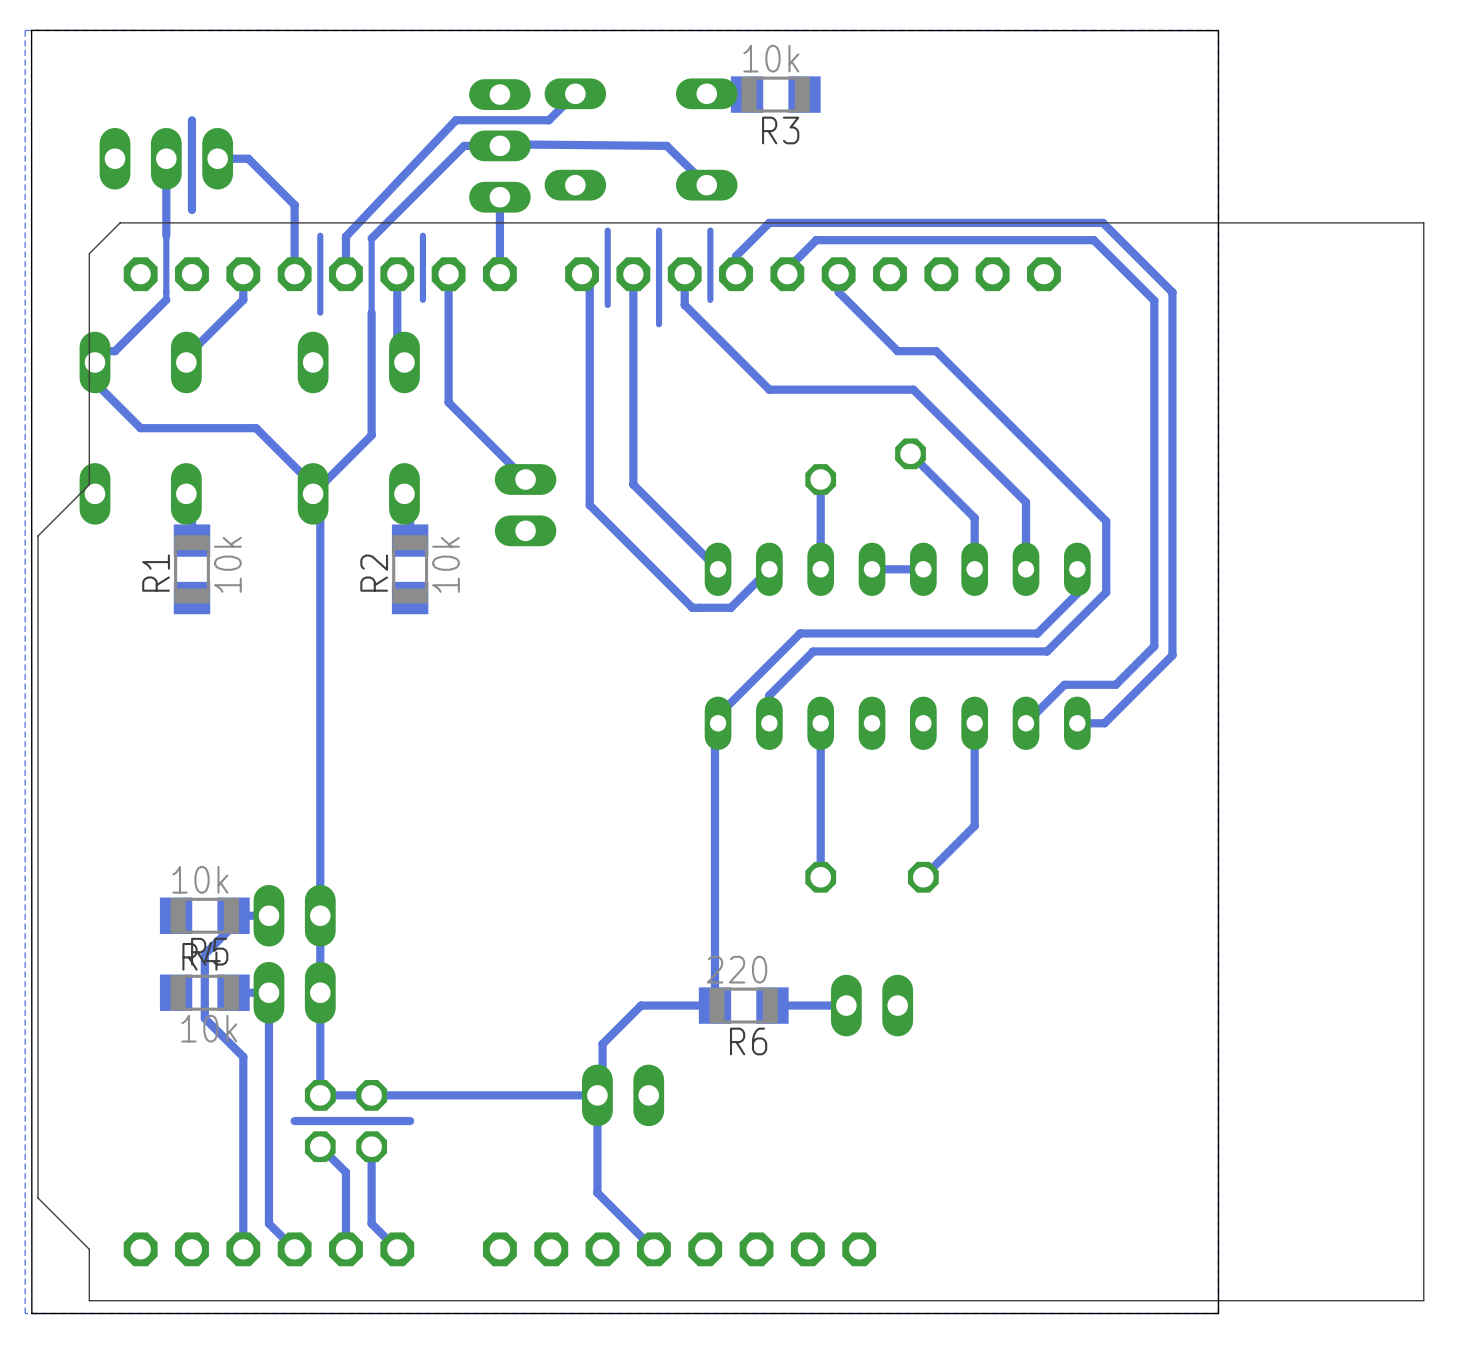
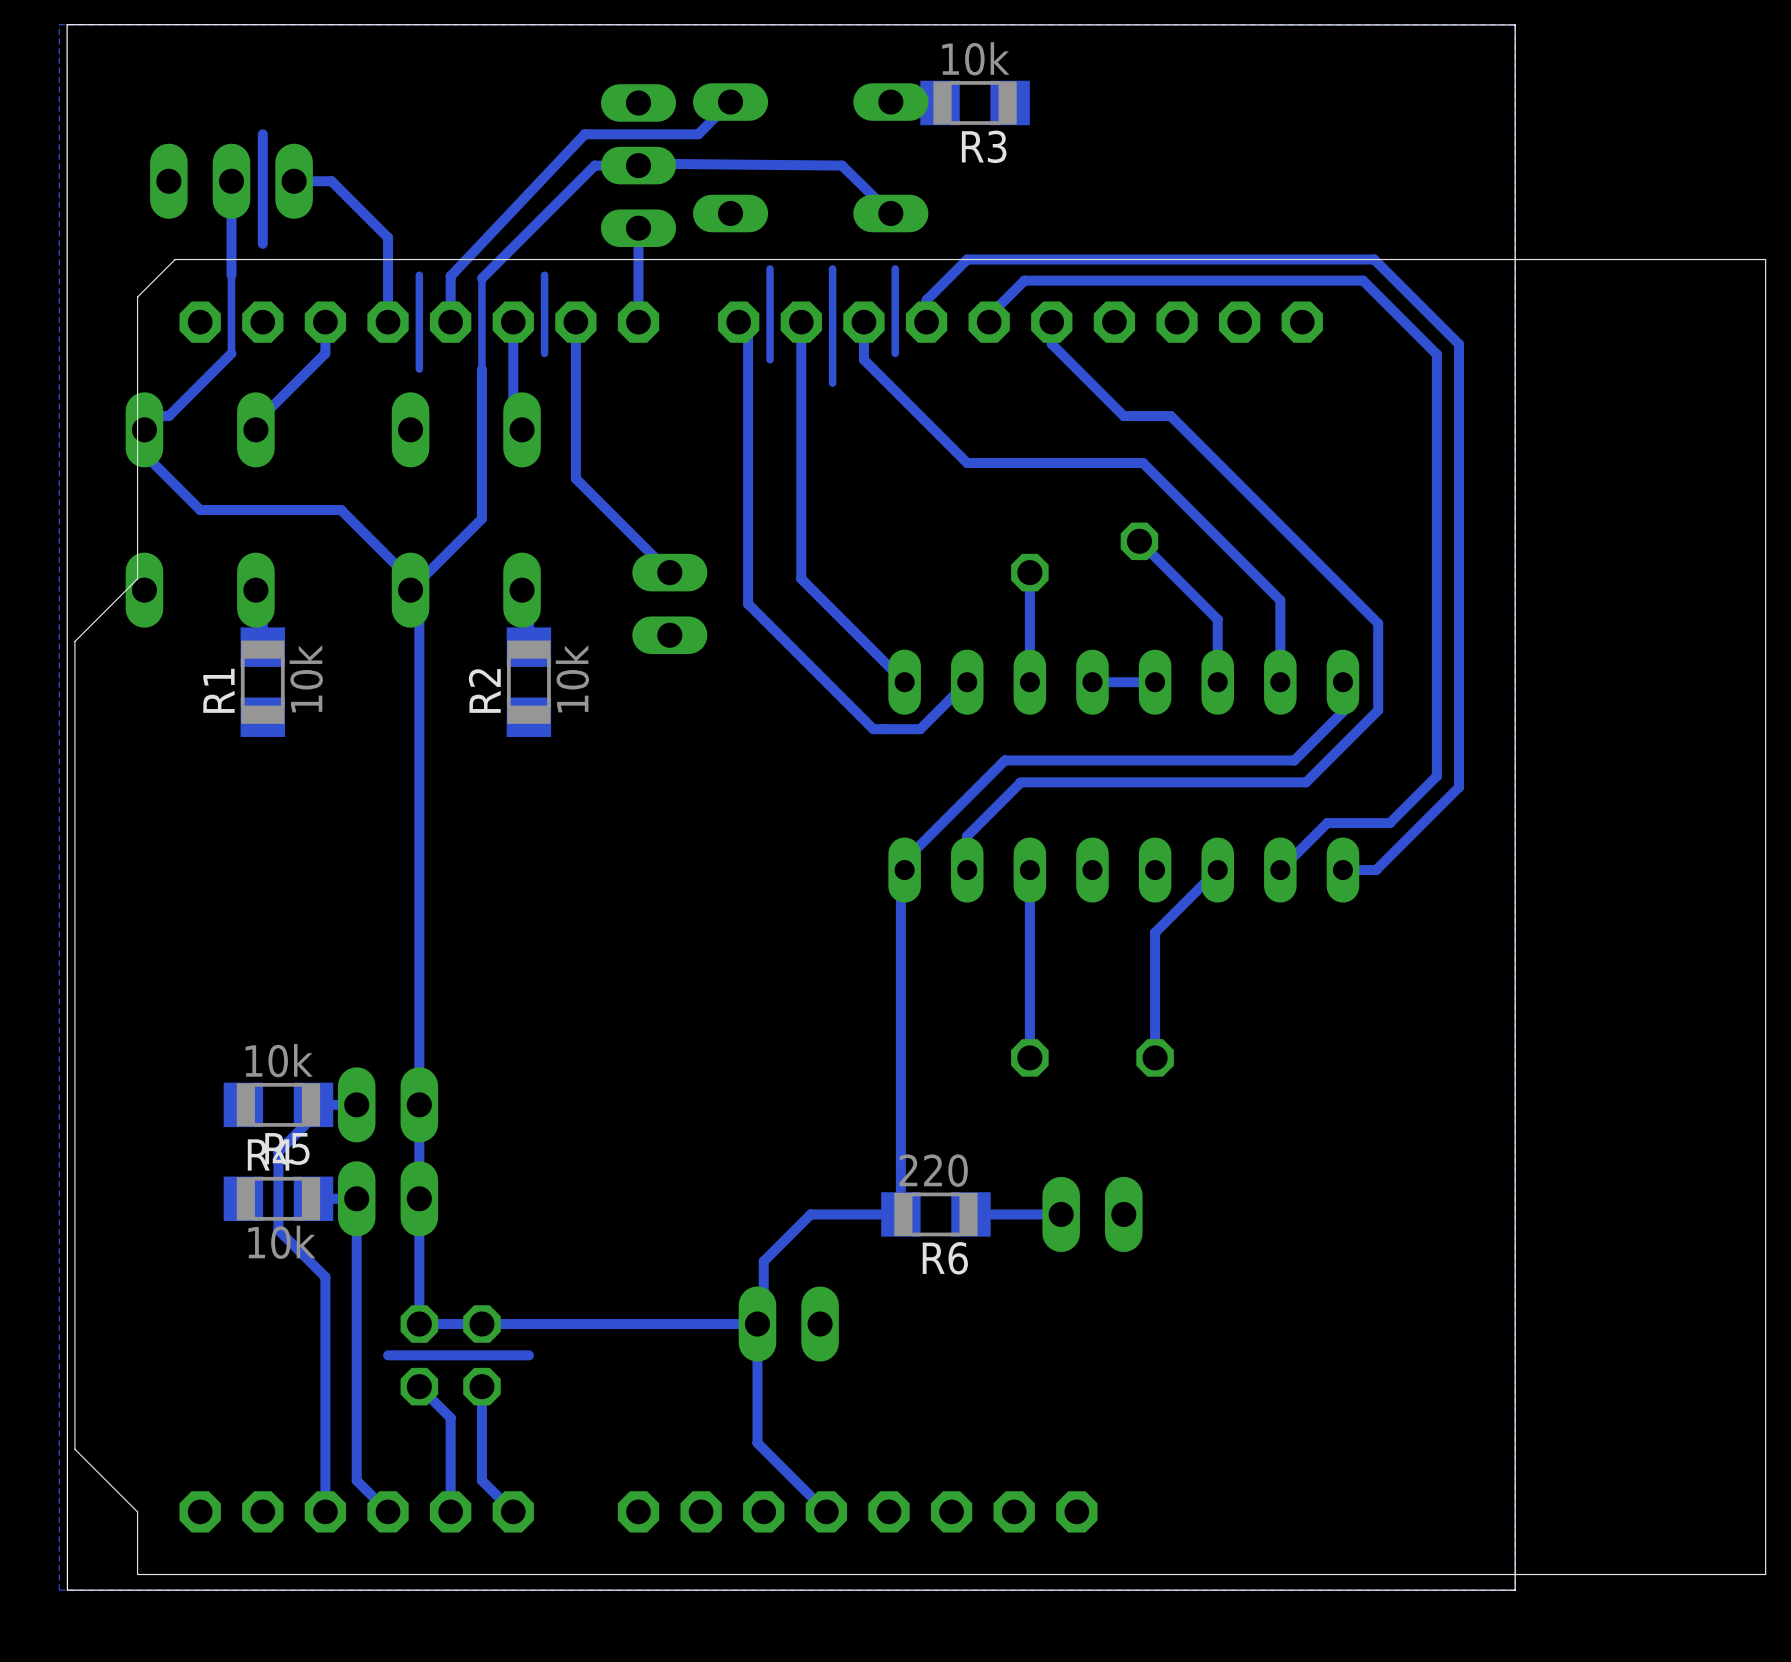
track: (974, 723) (974, 825) (923, 877) -> (1217, 870) (1155, 932) (1155, 1057)

